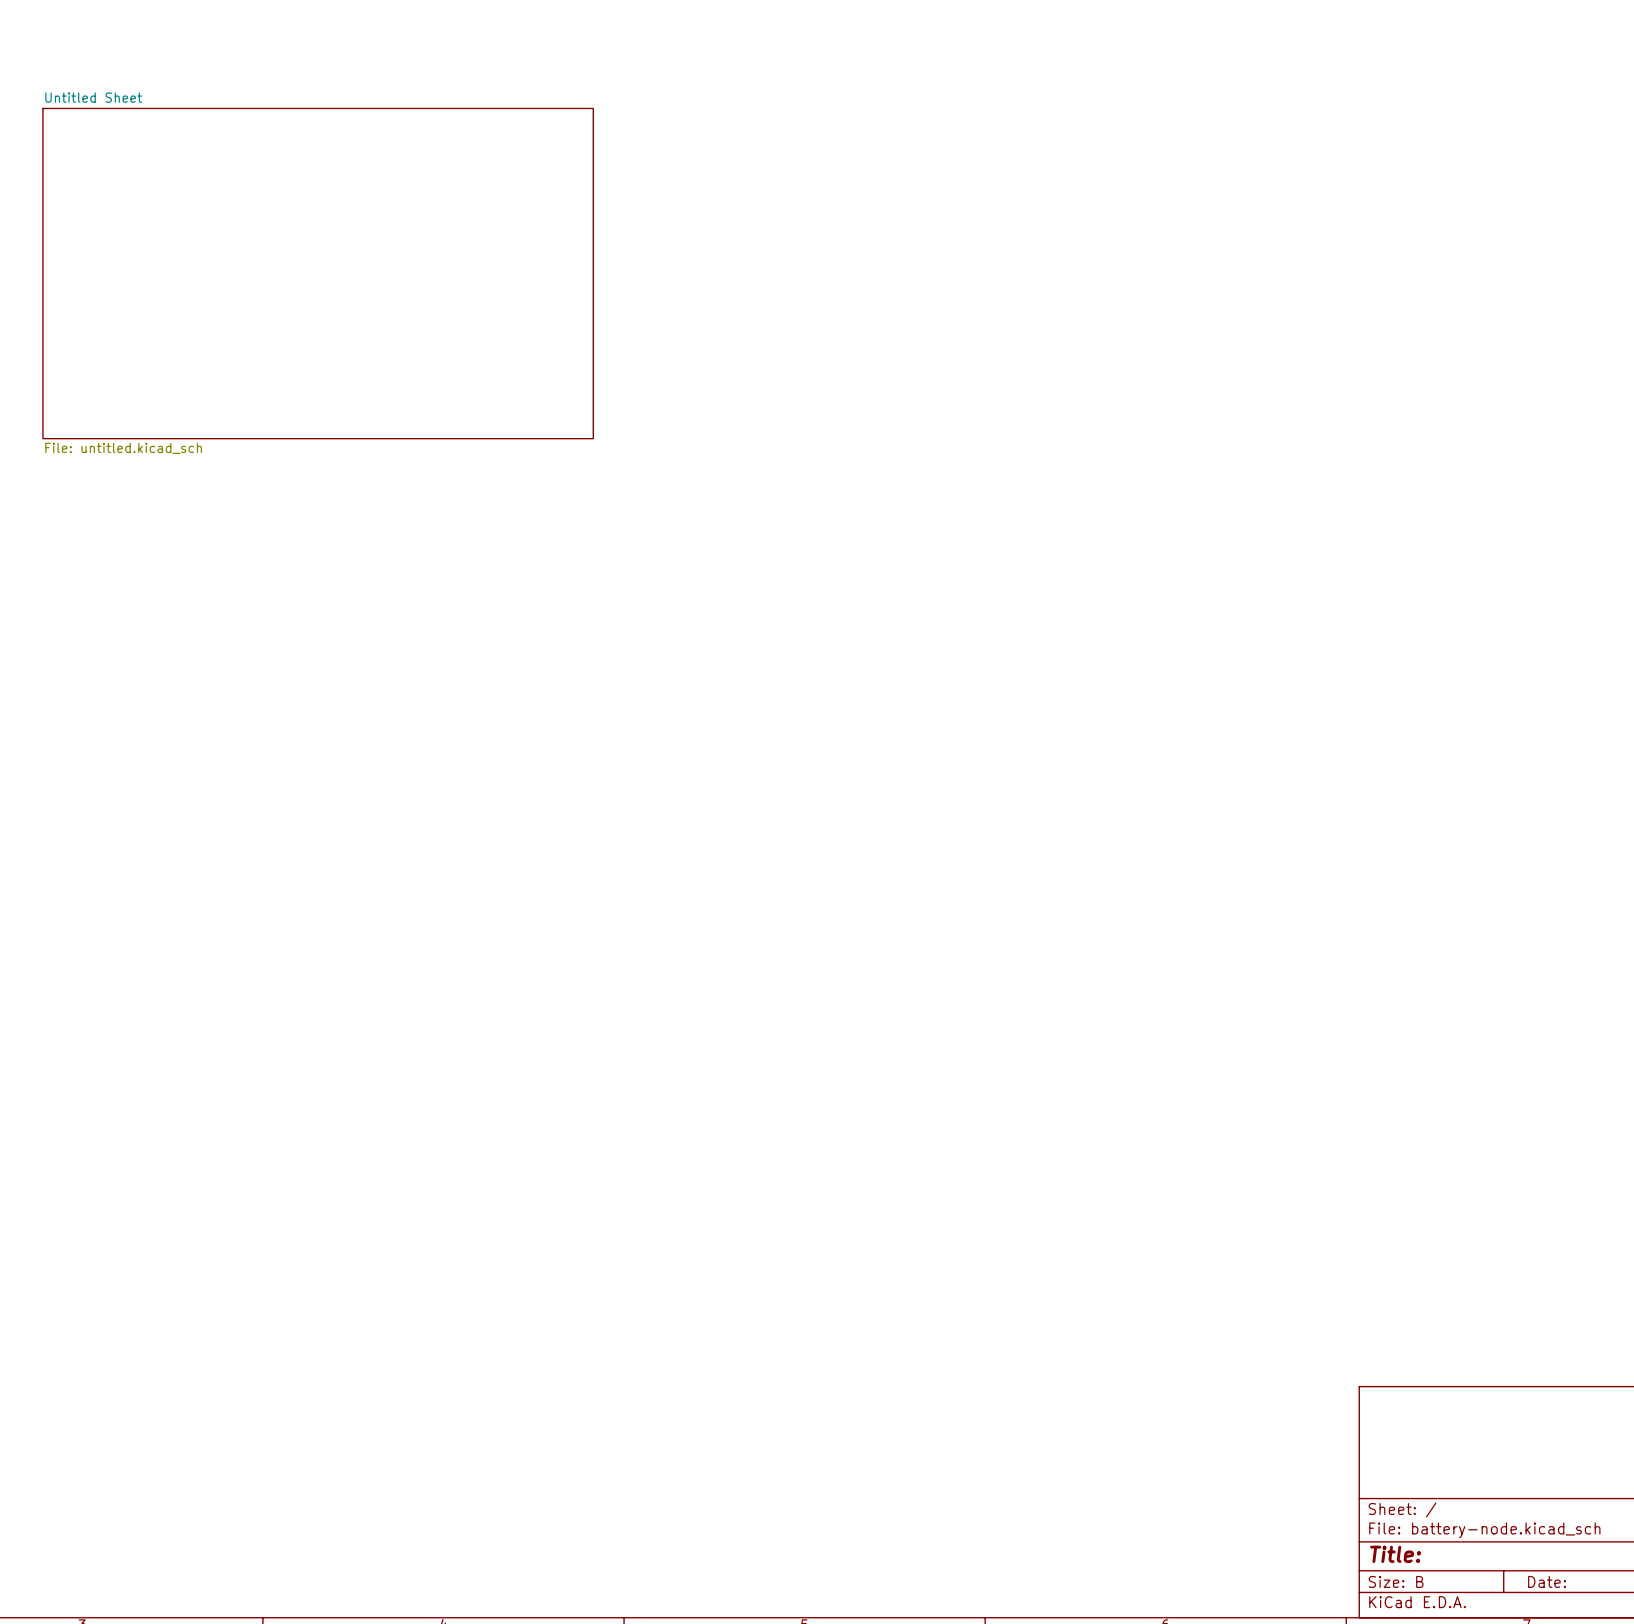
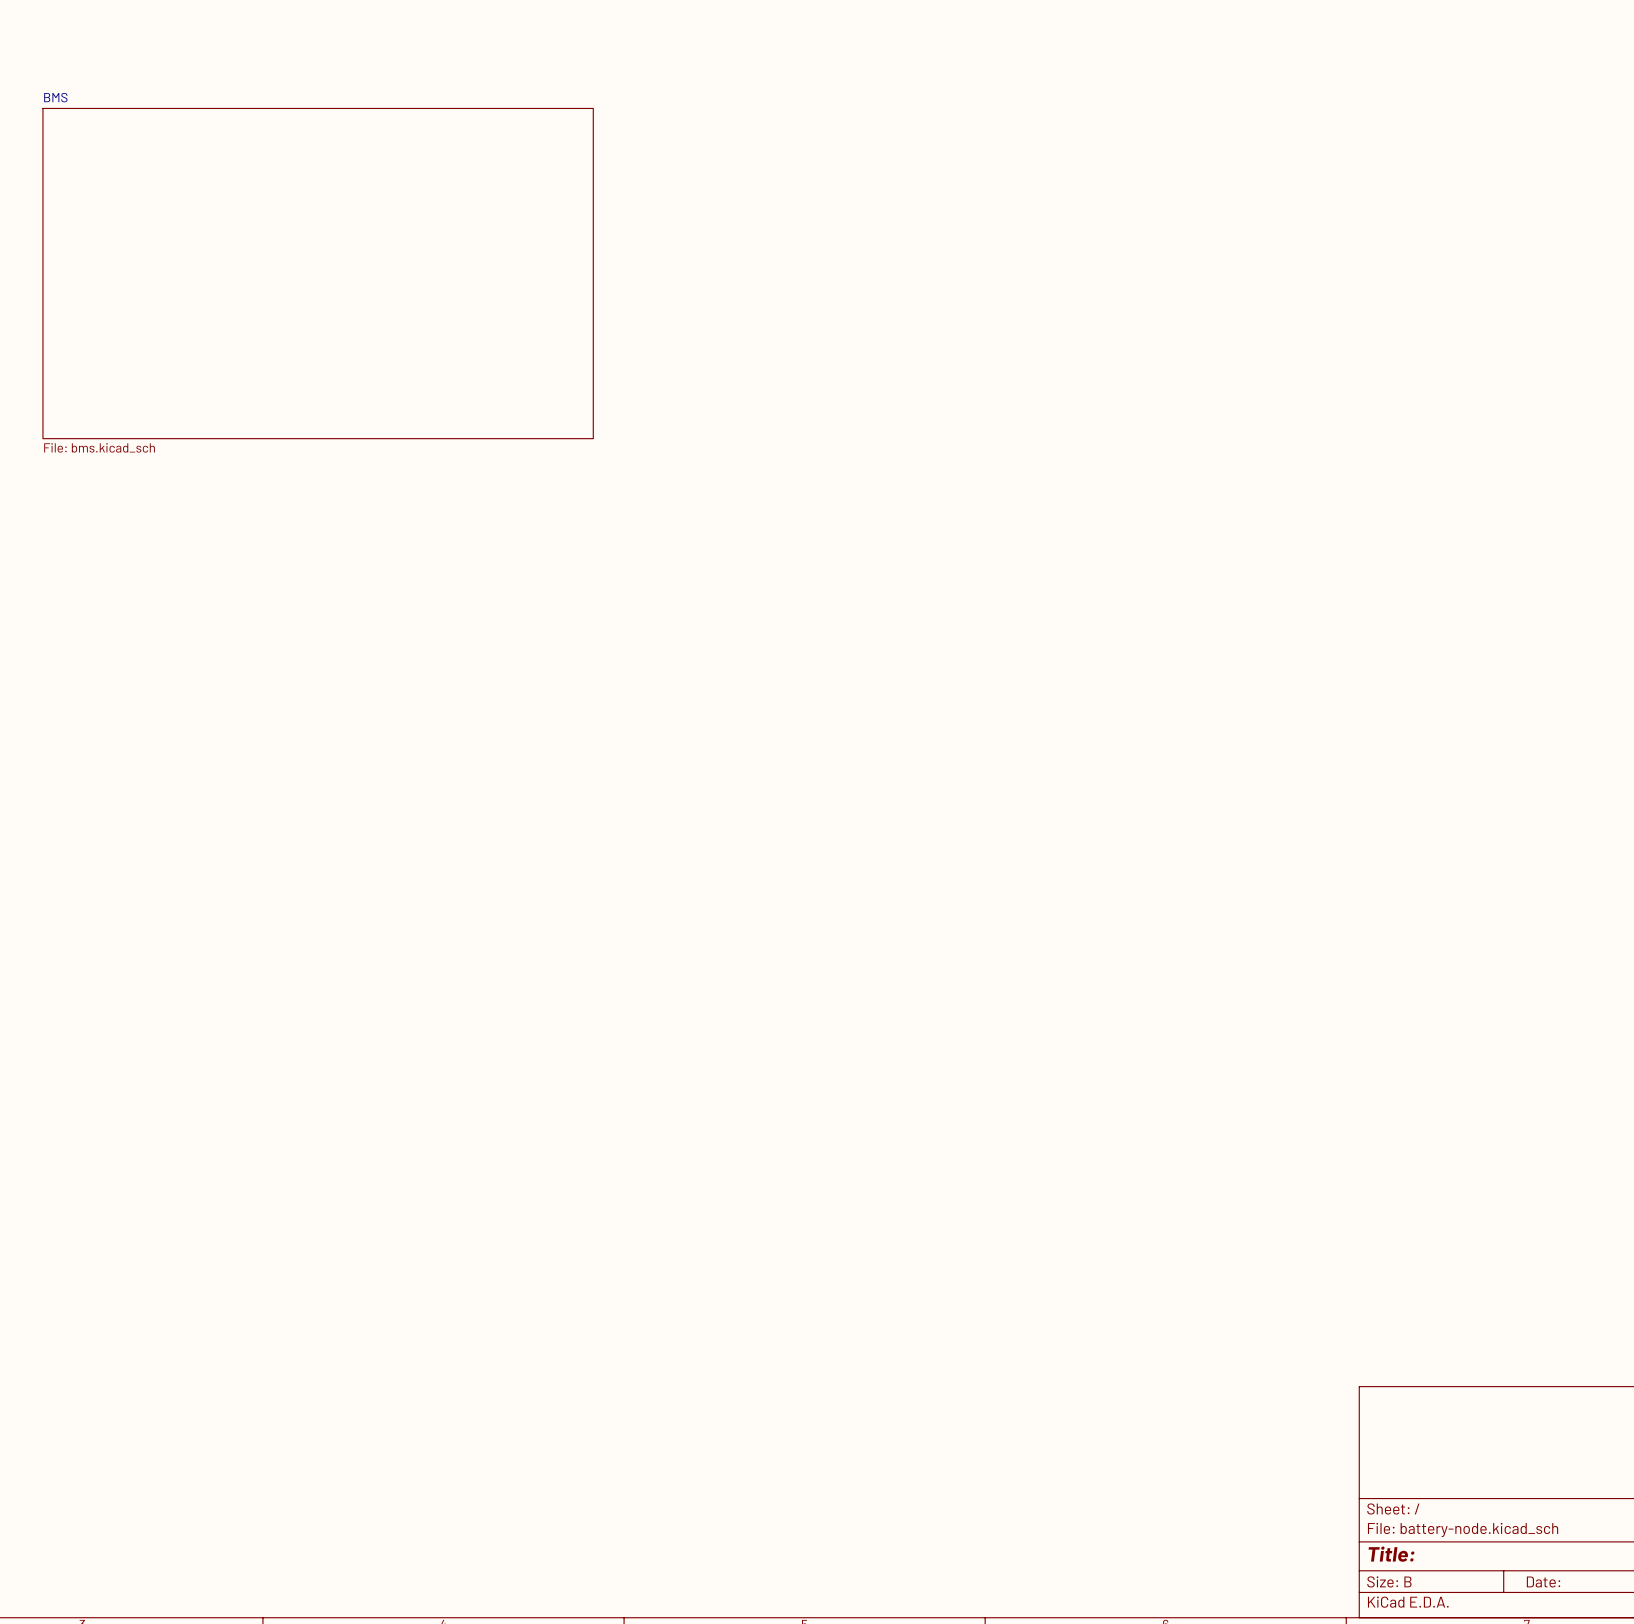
sheet Untitled Sheet name: Untitled Sheet (93, 97) -> BMS (55, 97)
sheet Untitled Sheet value: File: untitled.kicad_sch (123, 448) -> File: bms.kicad_sch (99, 447)

